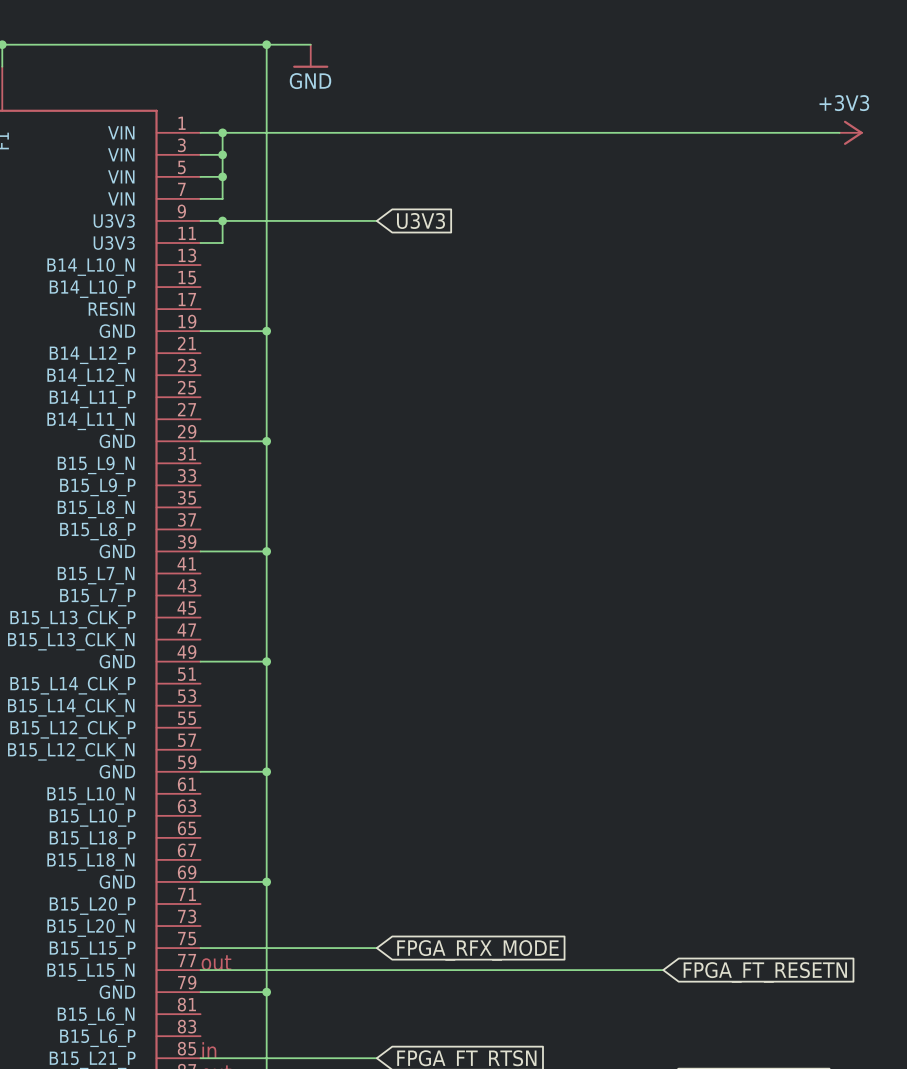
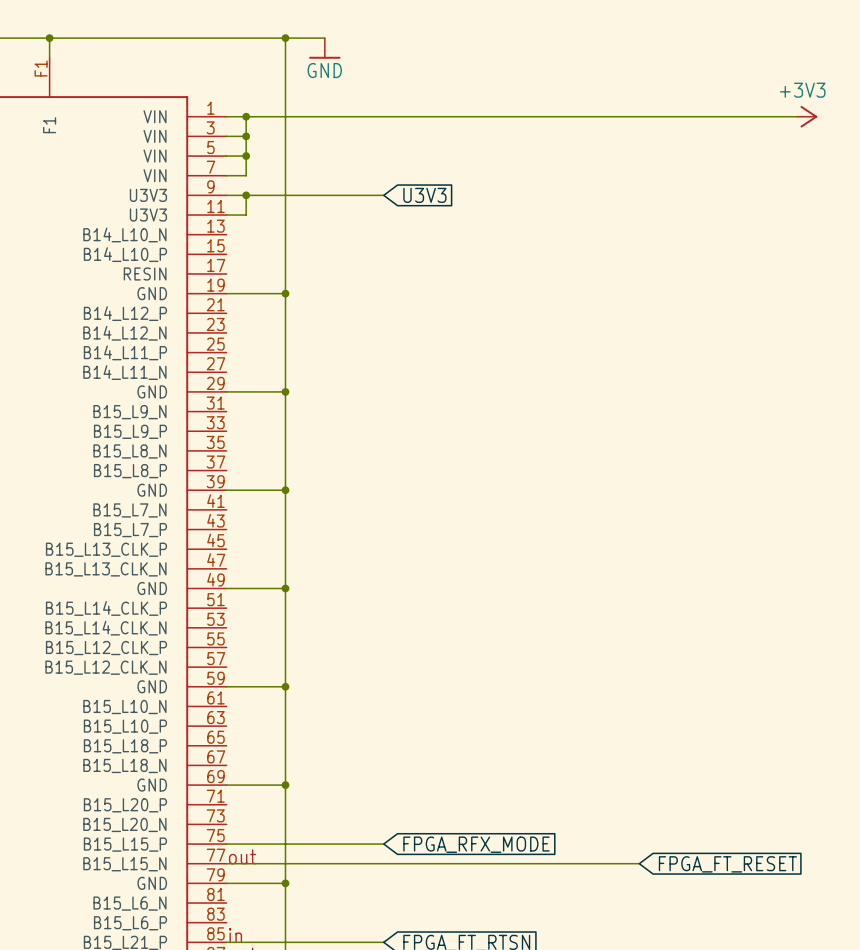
global label: FPGA_FT_RESETN (765, 972) -> FPGA_FT_RESET (727, 864)

